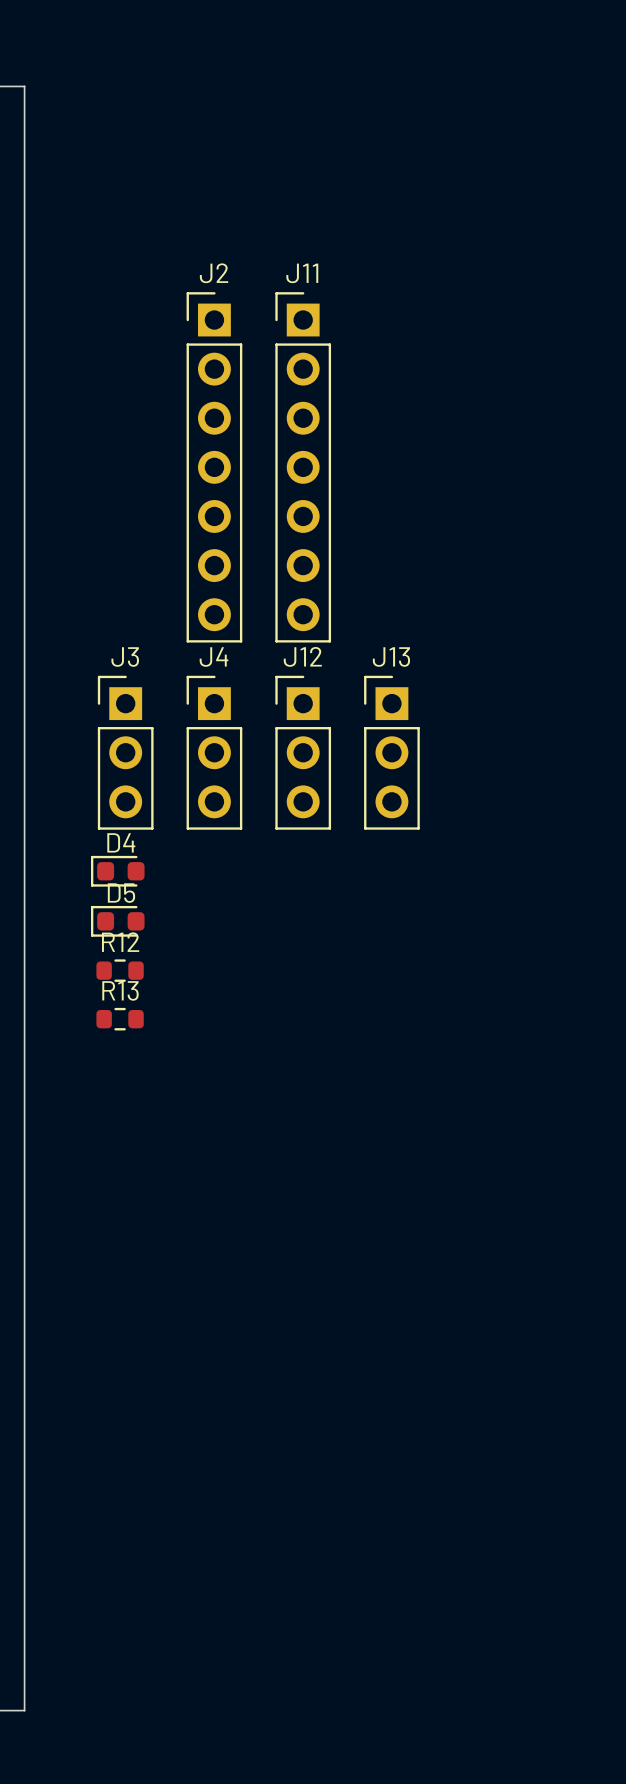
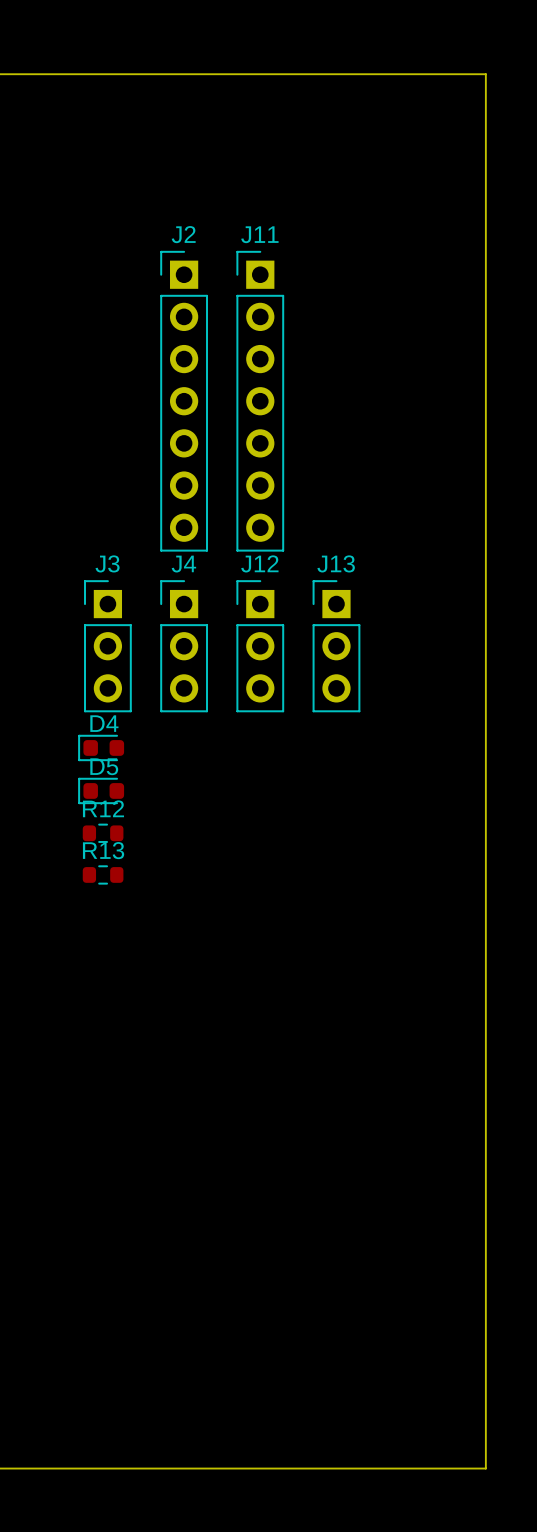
board edge: (24, 86) (24, 1710) -> (21, 74) (485, 74) (485, 1468) (21, 1468)

